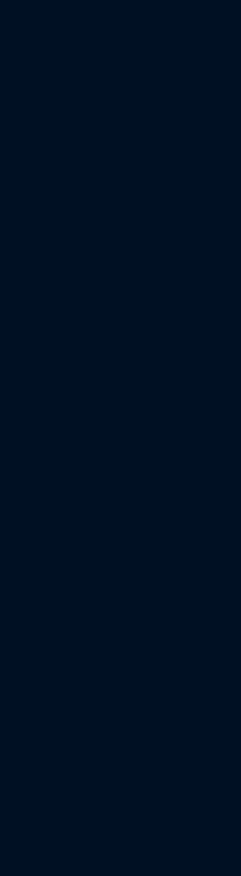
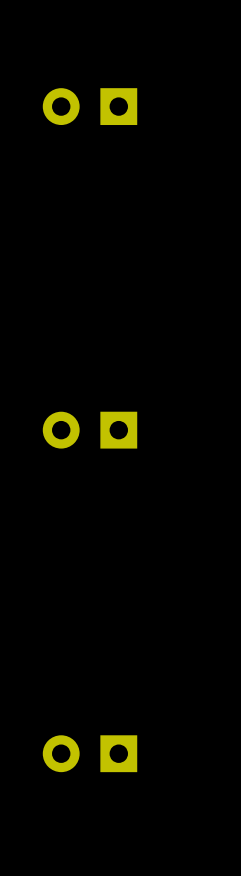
part: none -> (90, 106)
part: none -> (90, 430)
part: none -> (90, 753)

